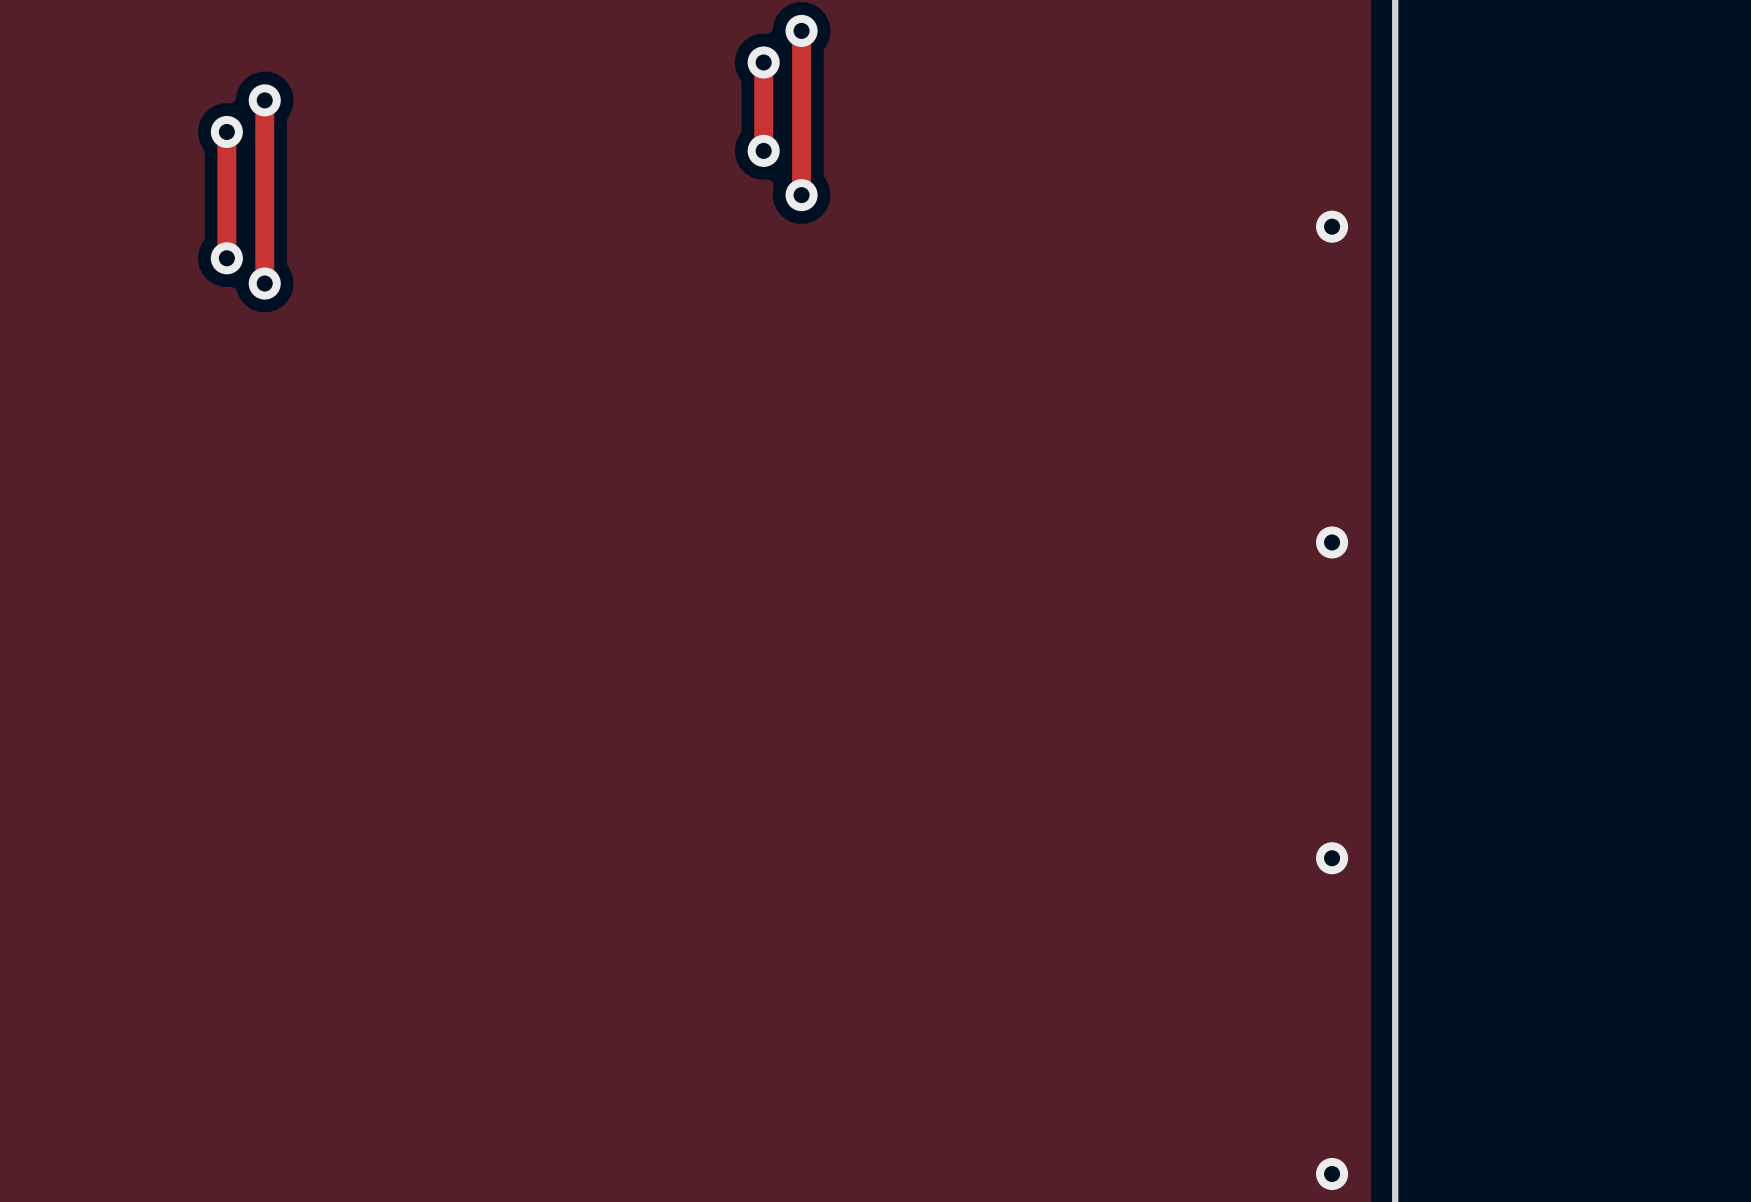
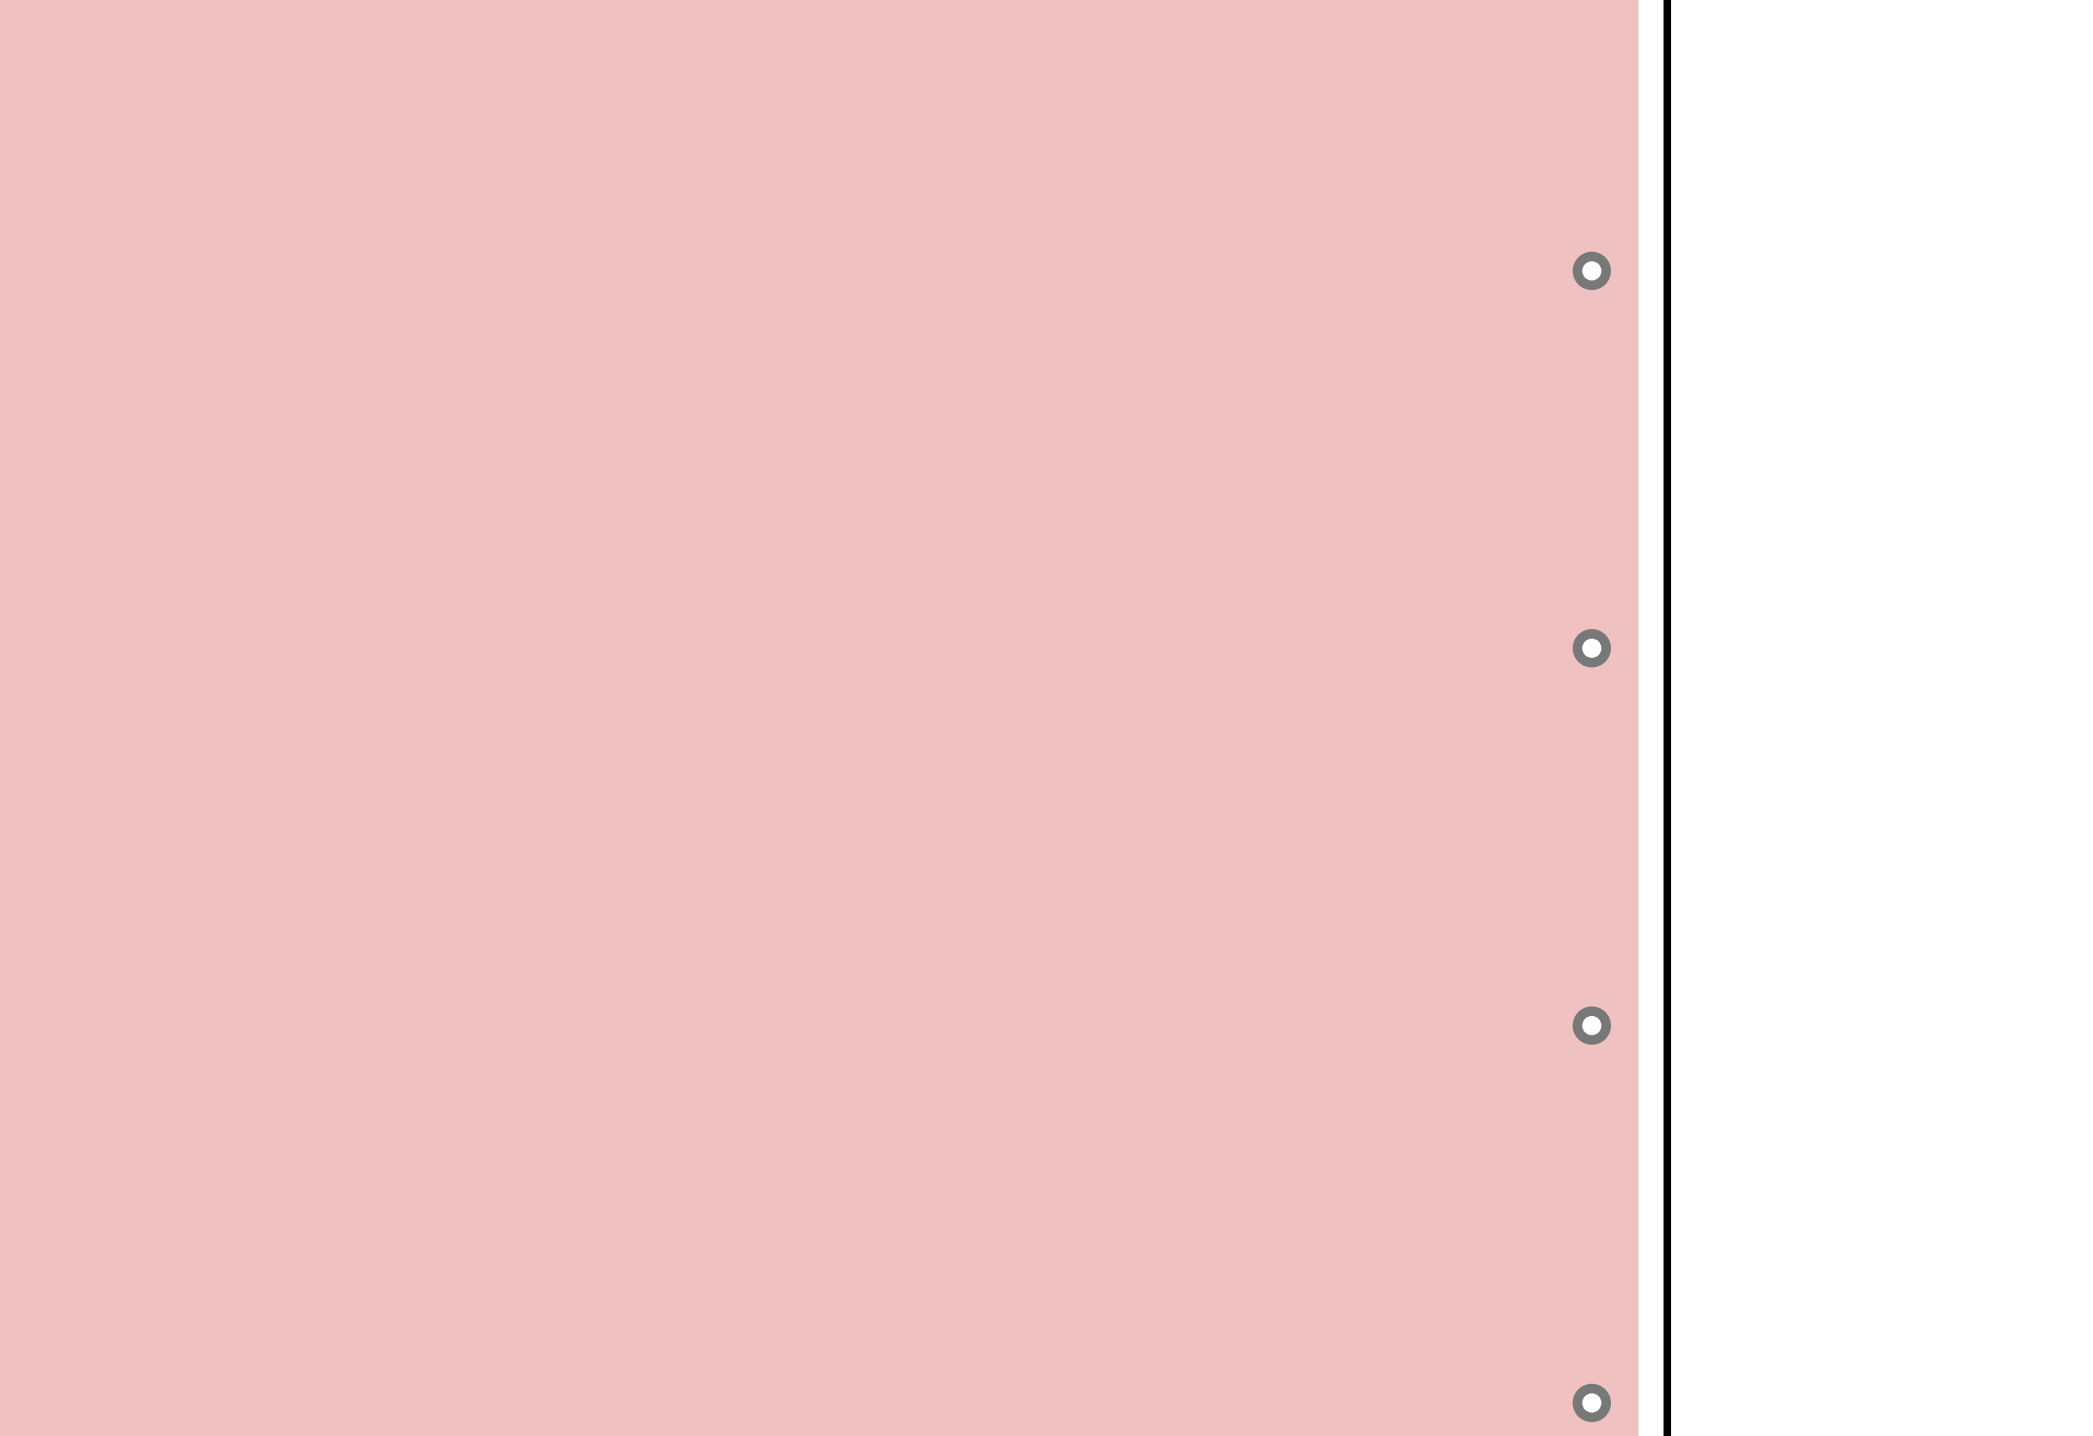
track: (801, 30) (801, 195) -> none
via: (801, 30) -> none
track: (763, 62) (763, 150) -> none
via: (763, 62) -> none
track: (264, 100) (264, 283) -> none
via: (264, 100) -> none
track: (226, 131) (226, 258) -> none
via: (226, 131) -> none
via: (763, 150) -> none
via: (801, 195) -> none
via: (226, 258) -> none
via: (264, 283) -> none

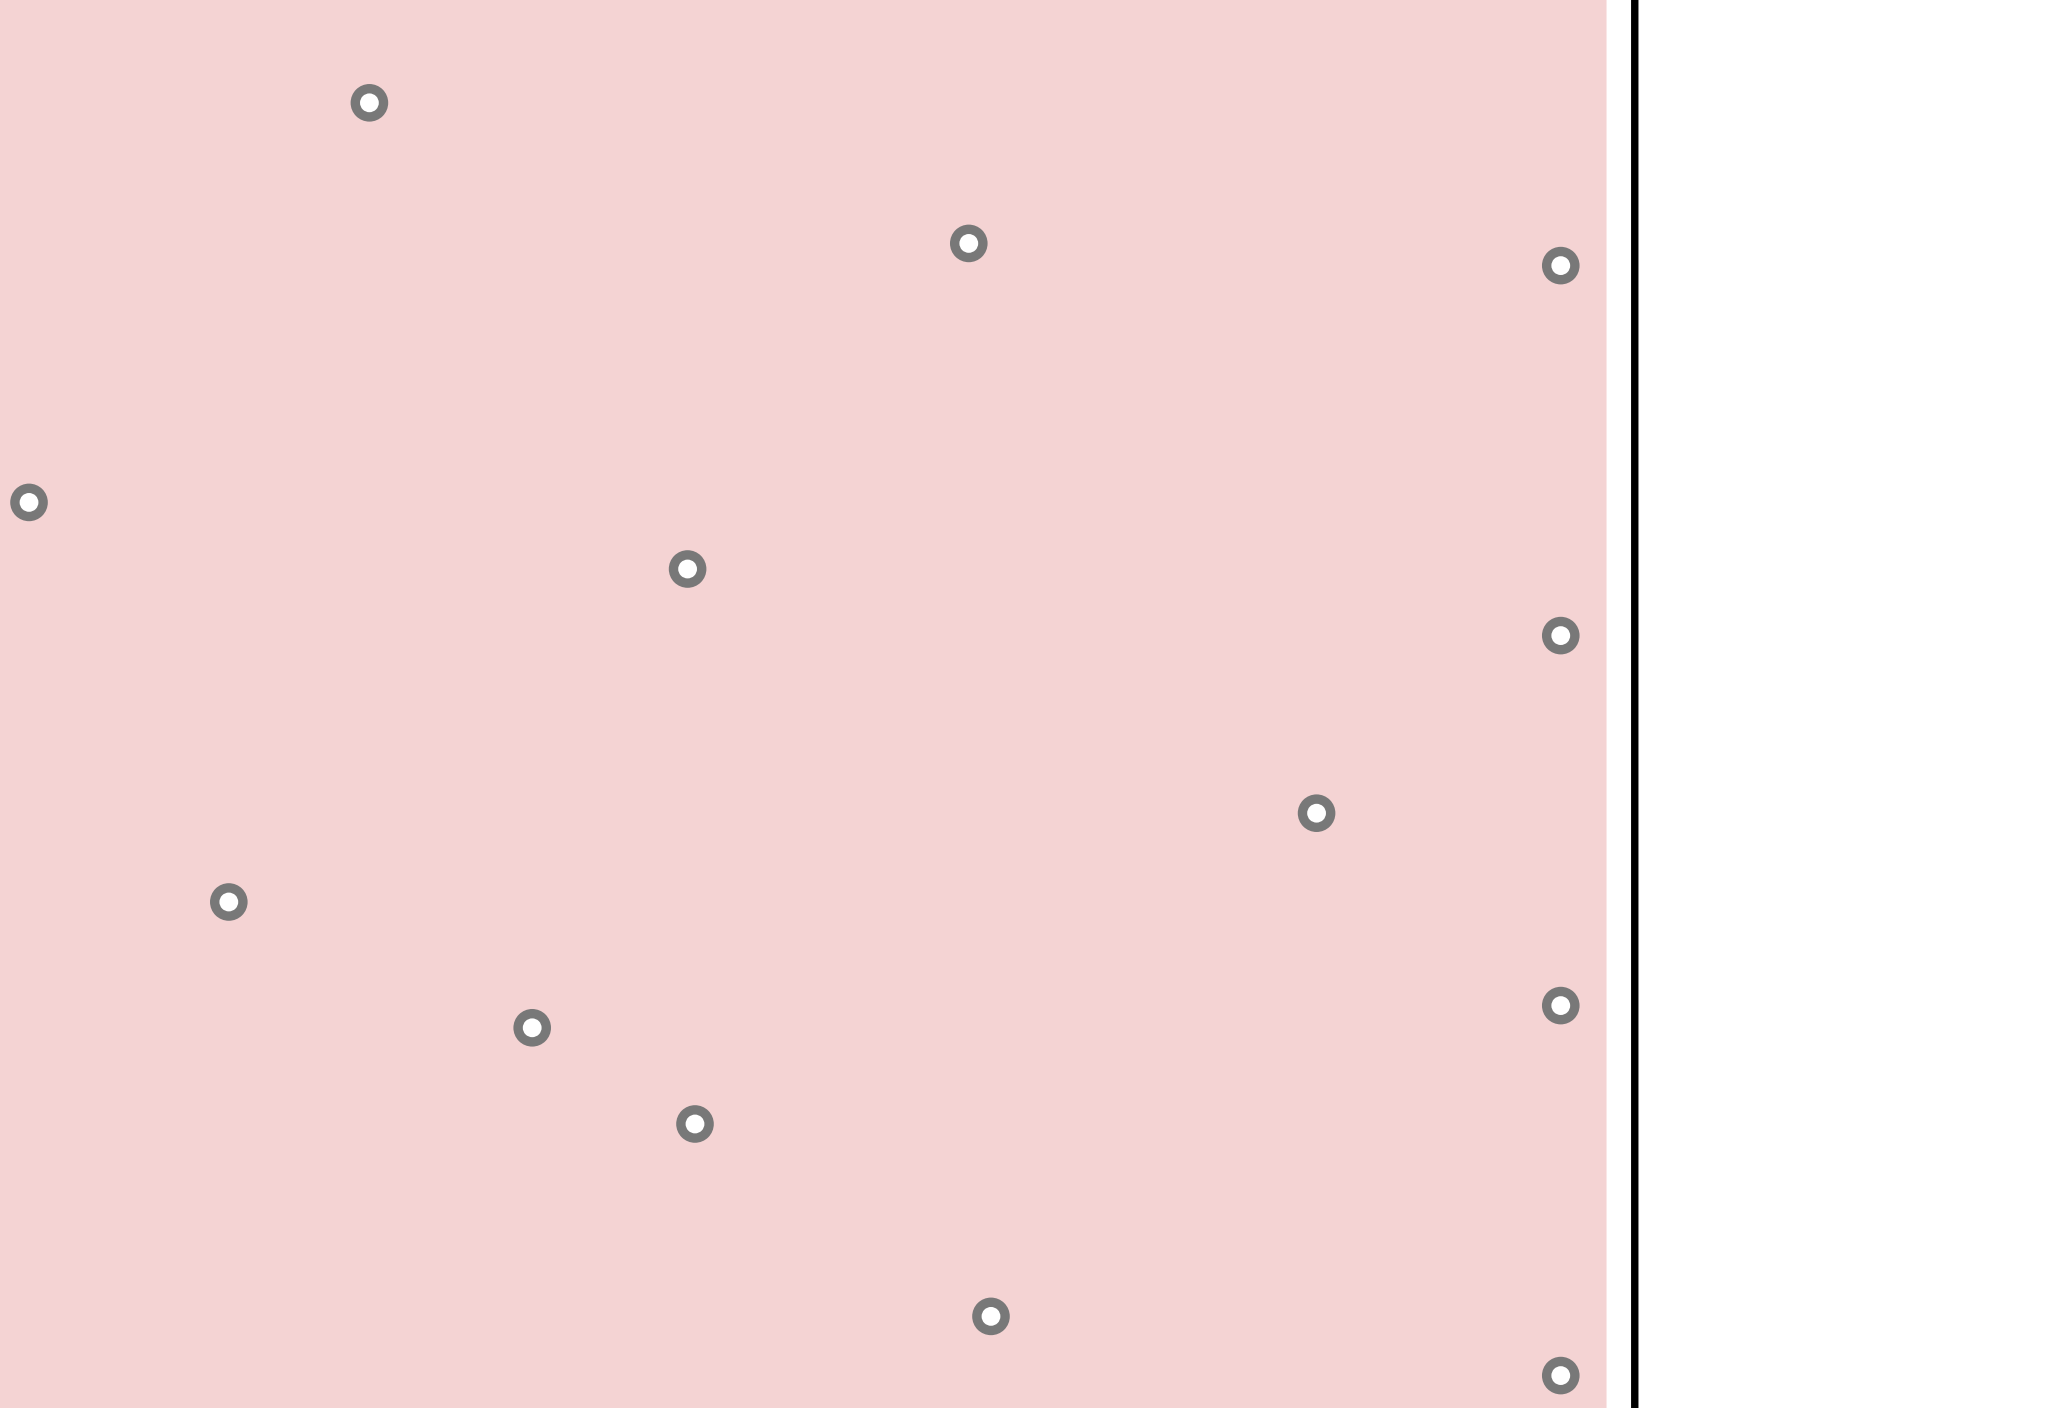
via: none -> (369, 102)
via: none -> (968, 243)
via: none -> (29, 502)
via: none -> (687, 569)
via: none -> (1316, 813)
via: none -> (228, 901)
via: none -> (532, 1027)
via: none -> (694, 1123)
via: none -> (990, 1316)

